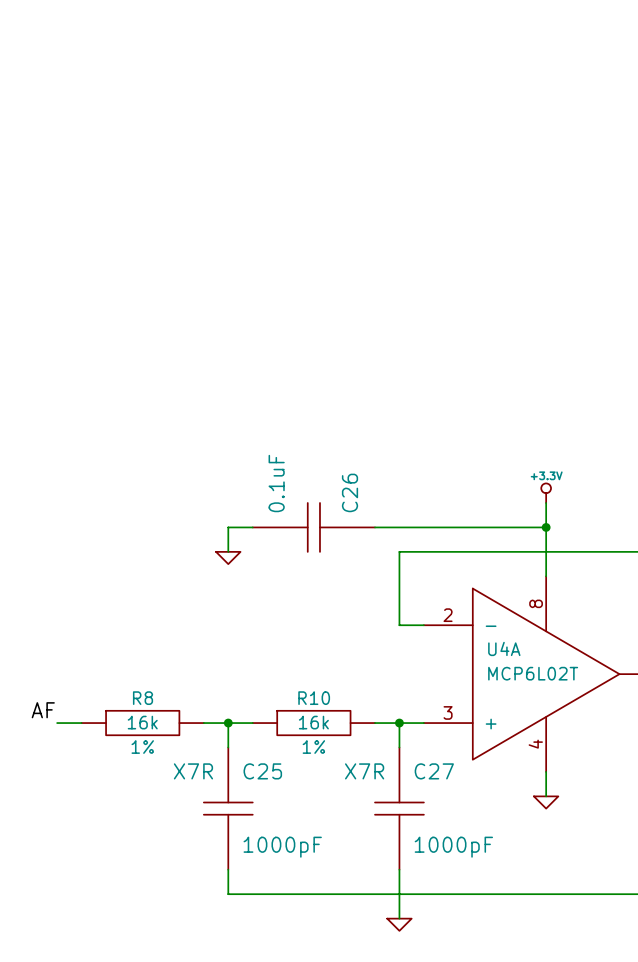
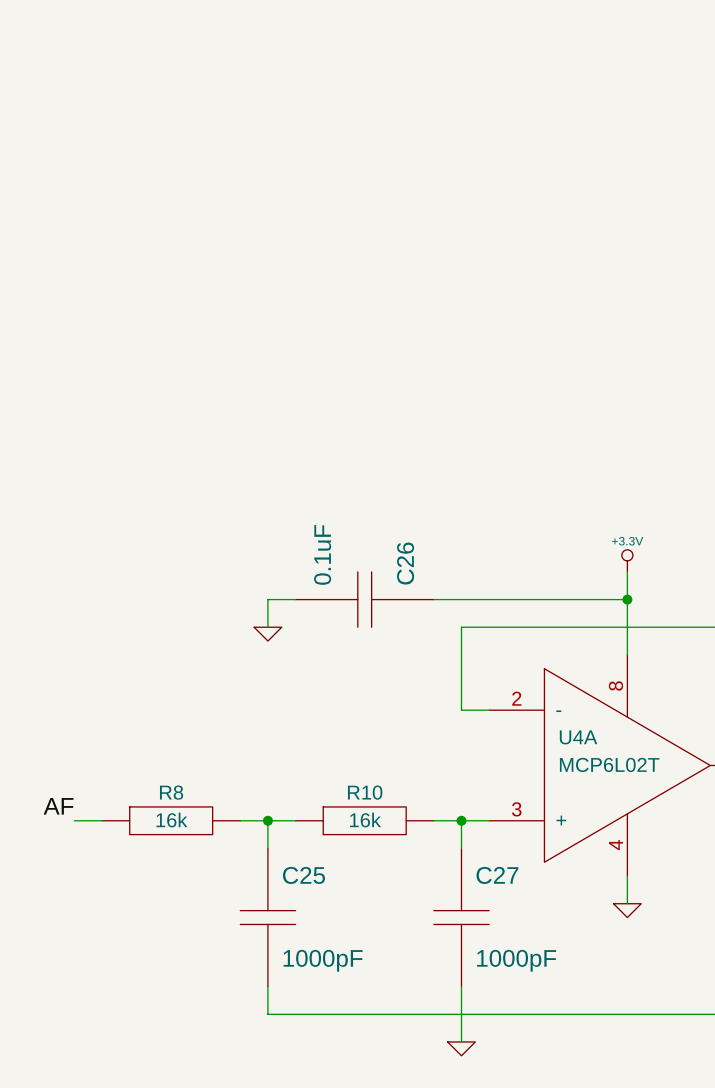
R8 text: 1% (142, 747) -> none
R10 text: 1% (313, 747) -> none
C25 text: X7R (193, 771) -> none
C27 text: X7R (364, 771) -> none

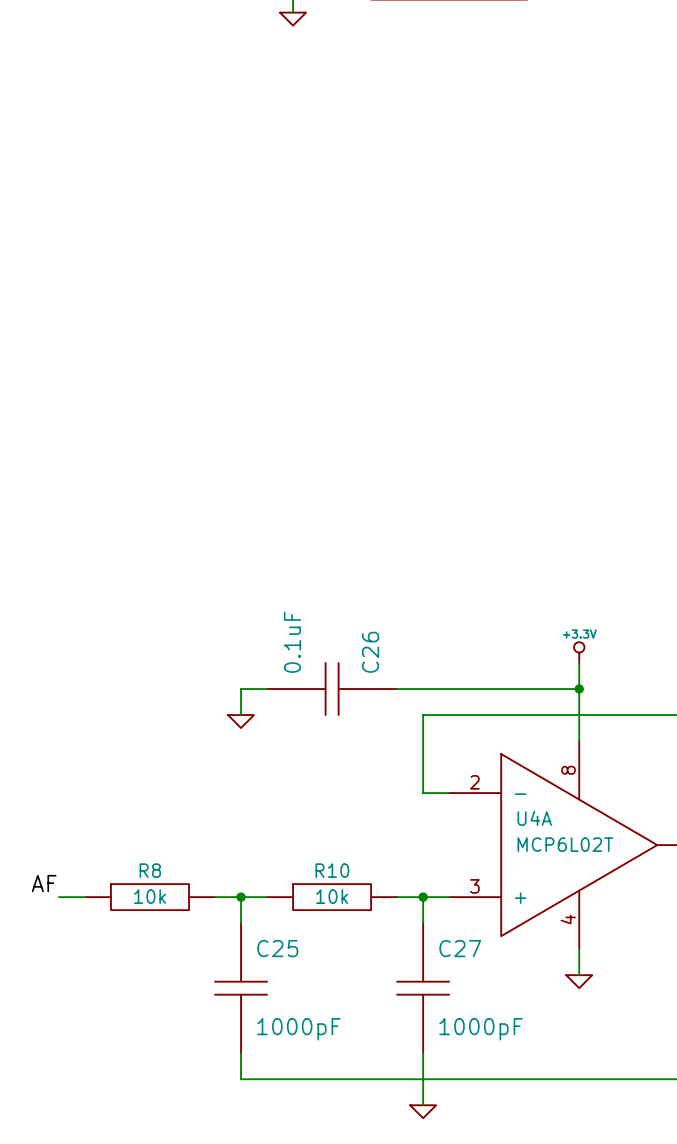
R8 value: 16k (171, 819) -> 10k (149, 896)
R10 value: 16k (365, 819) -> 10k (332, 896)

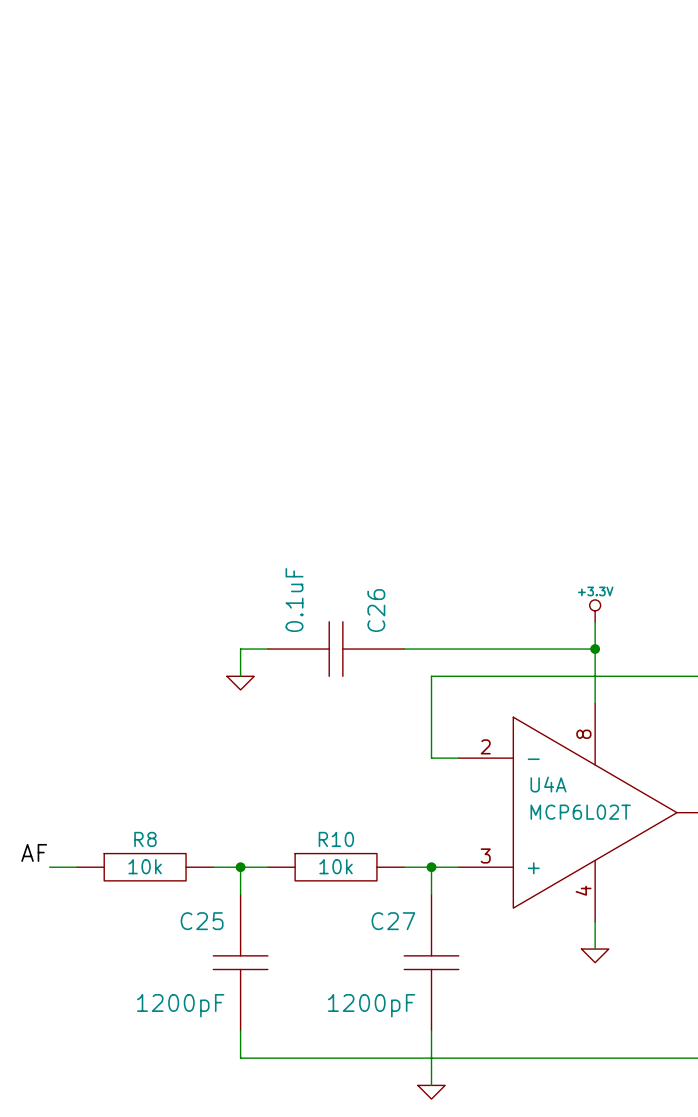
C25 name position: C25 (277, 948) -> C25 (202, 921)
C27 name position: C27 (460, 948) -> C27 (393, 921)
C25 value: 1000pF (298, 1029) -> 1200pF (180, 1005)
C27 value: 1000pF (481, 1029) -> 1200pF (371, 1005)

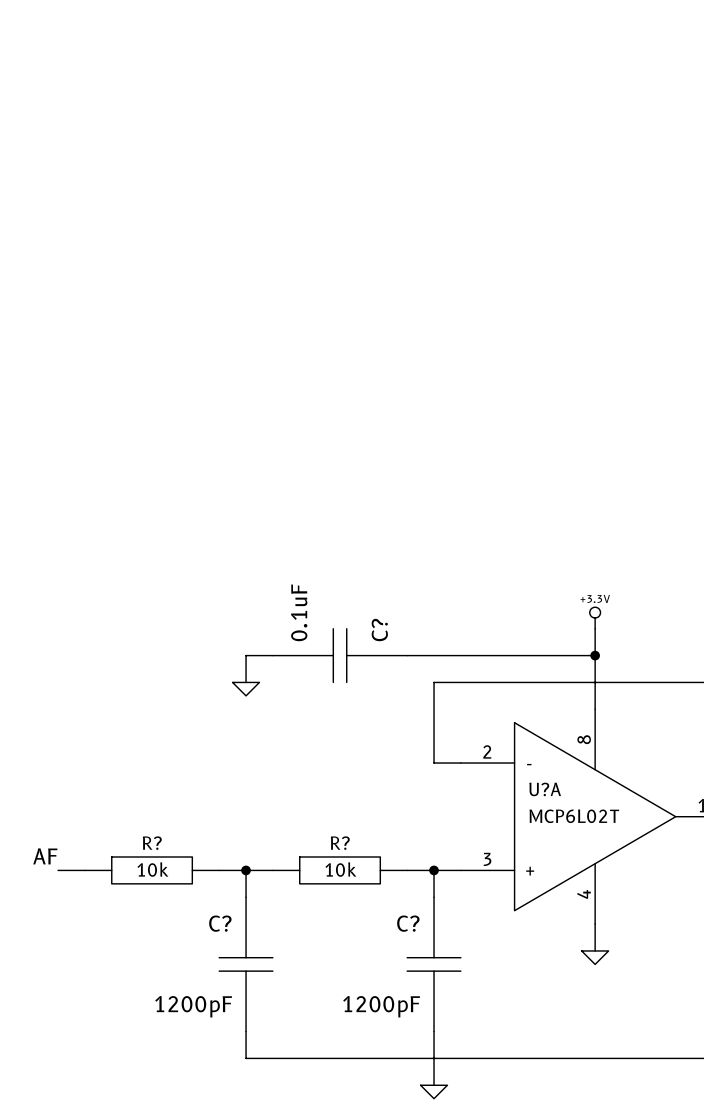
C26 name: C26 (376, 610) -> C? (379, 630)
U4A name: U4A (548, 784) -> U?A (545, 789)
R8 name: R8 (145, 839) -> R? (152, 843)
R10 name: R10 (336, 839) -> R? (340, 843)
C25 name: C25 (202, 921) -> C? (220, 923)
C27 name: C27 (393, 921) -> C? (408, 923)

